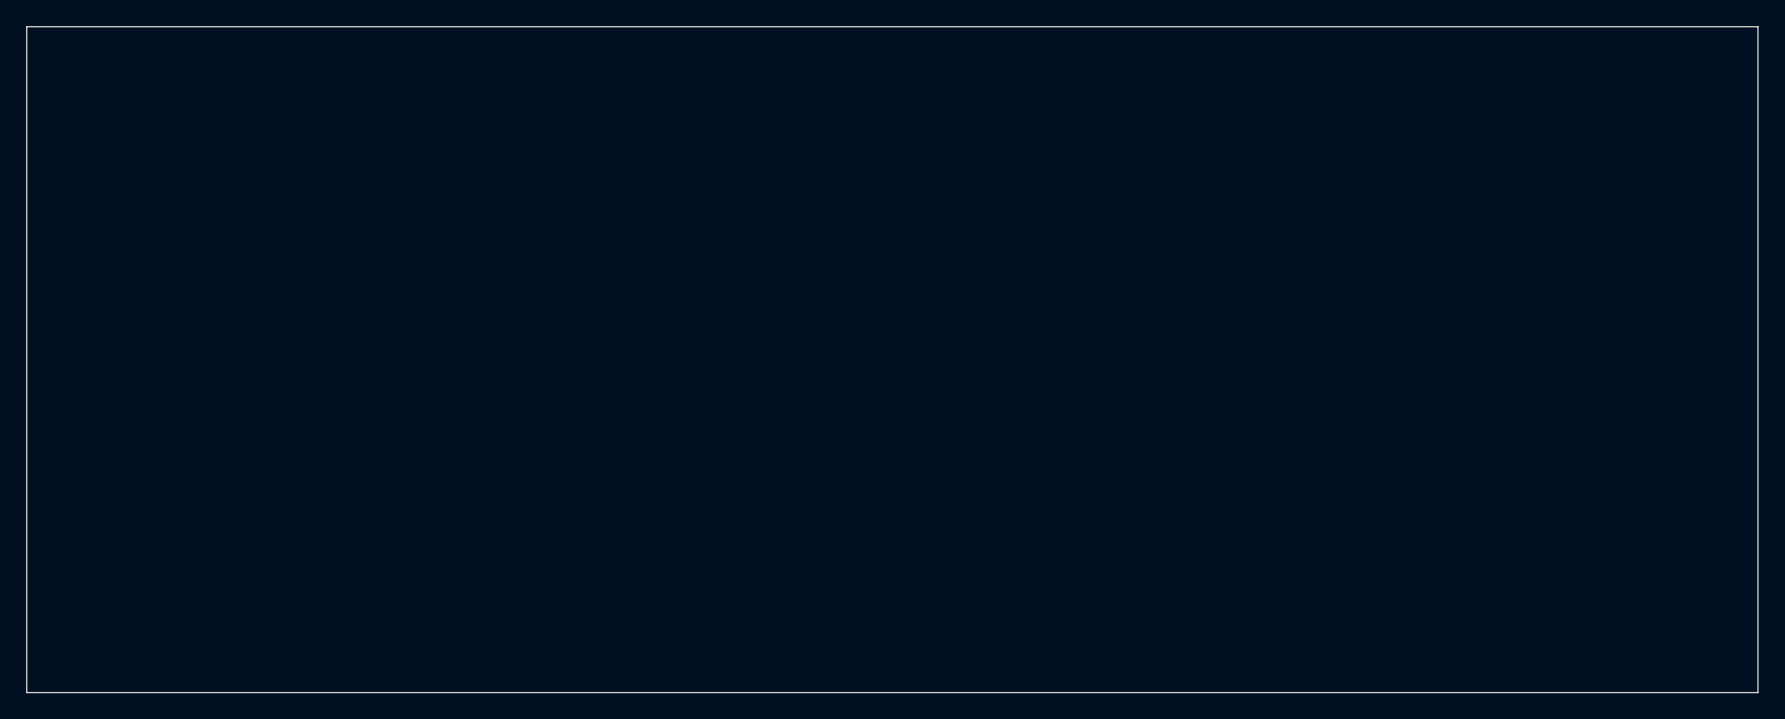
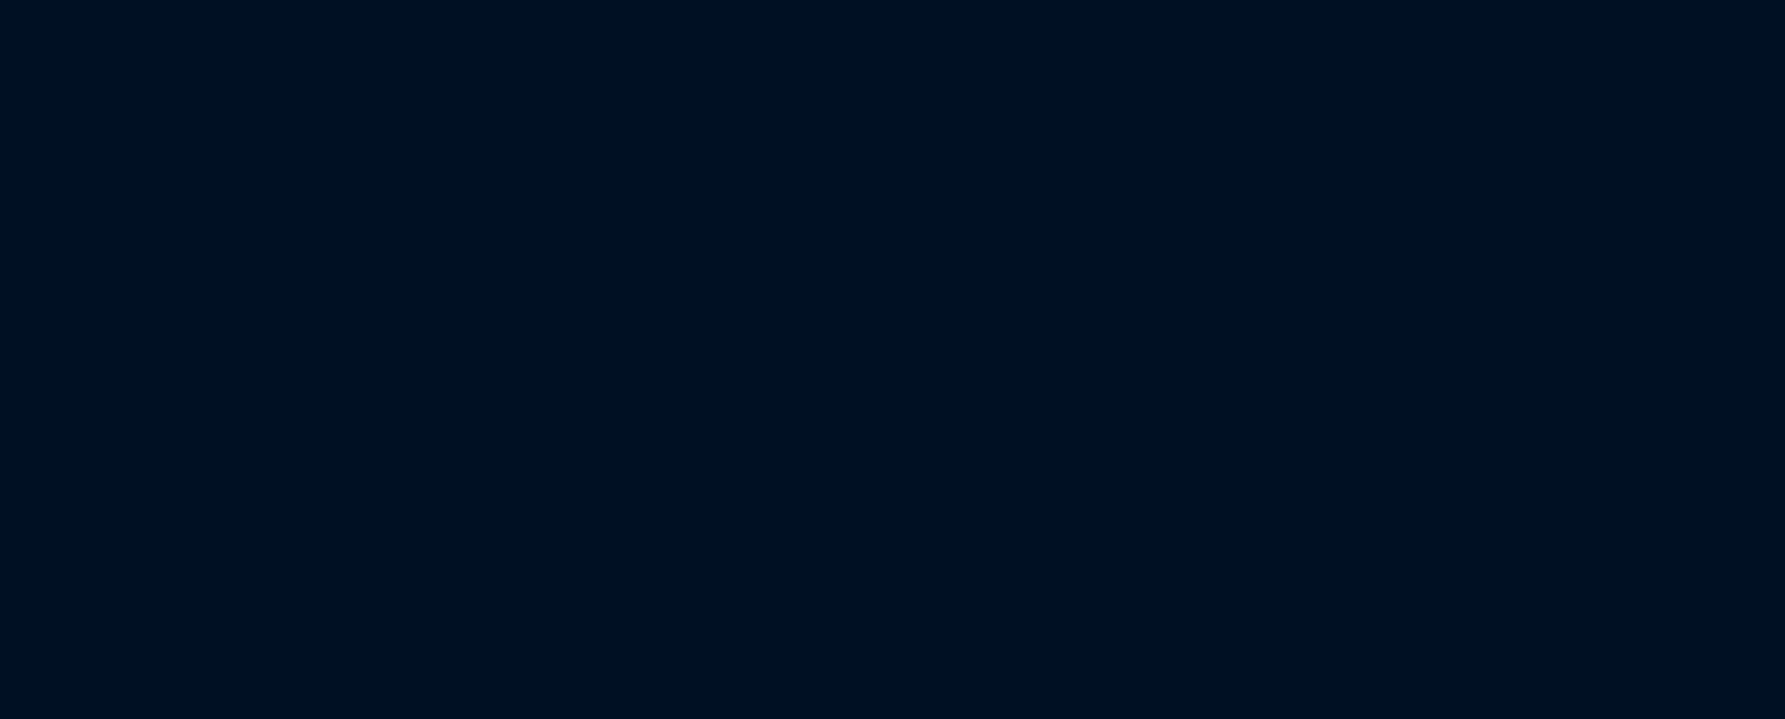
board edge: (26, 26) (26, 692) (1757, 692) (1757, 26) (26, 26) -> none

